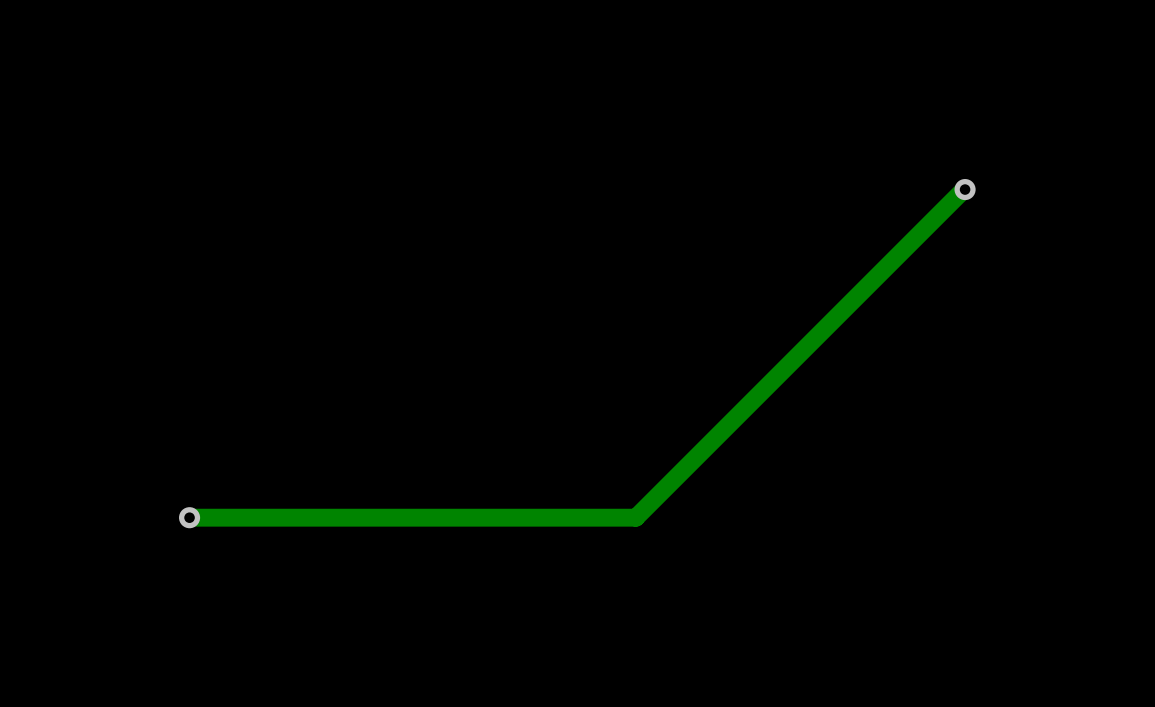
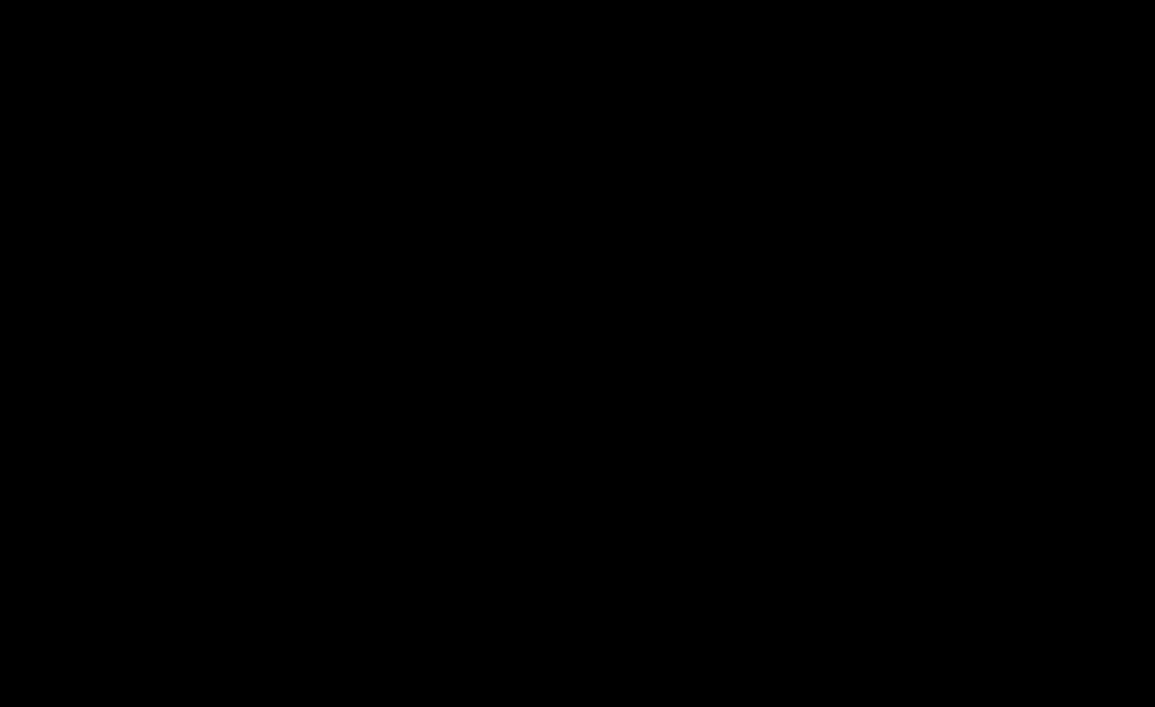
track: (965, 189) (635, 517) (189, 517) -> none
via: (965, 189) -> none
via: (189, 517) -> none

